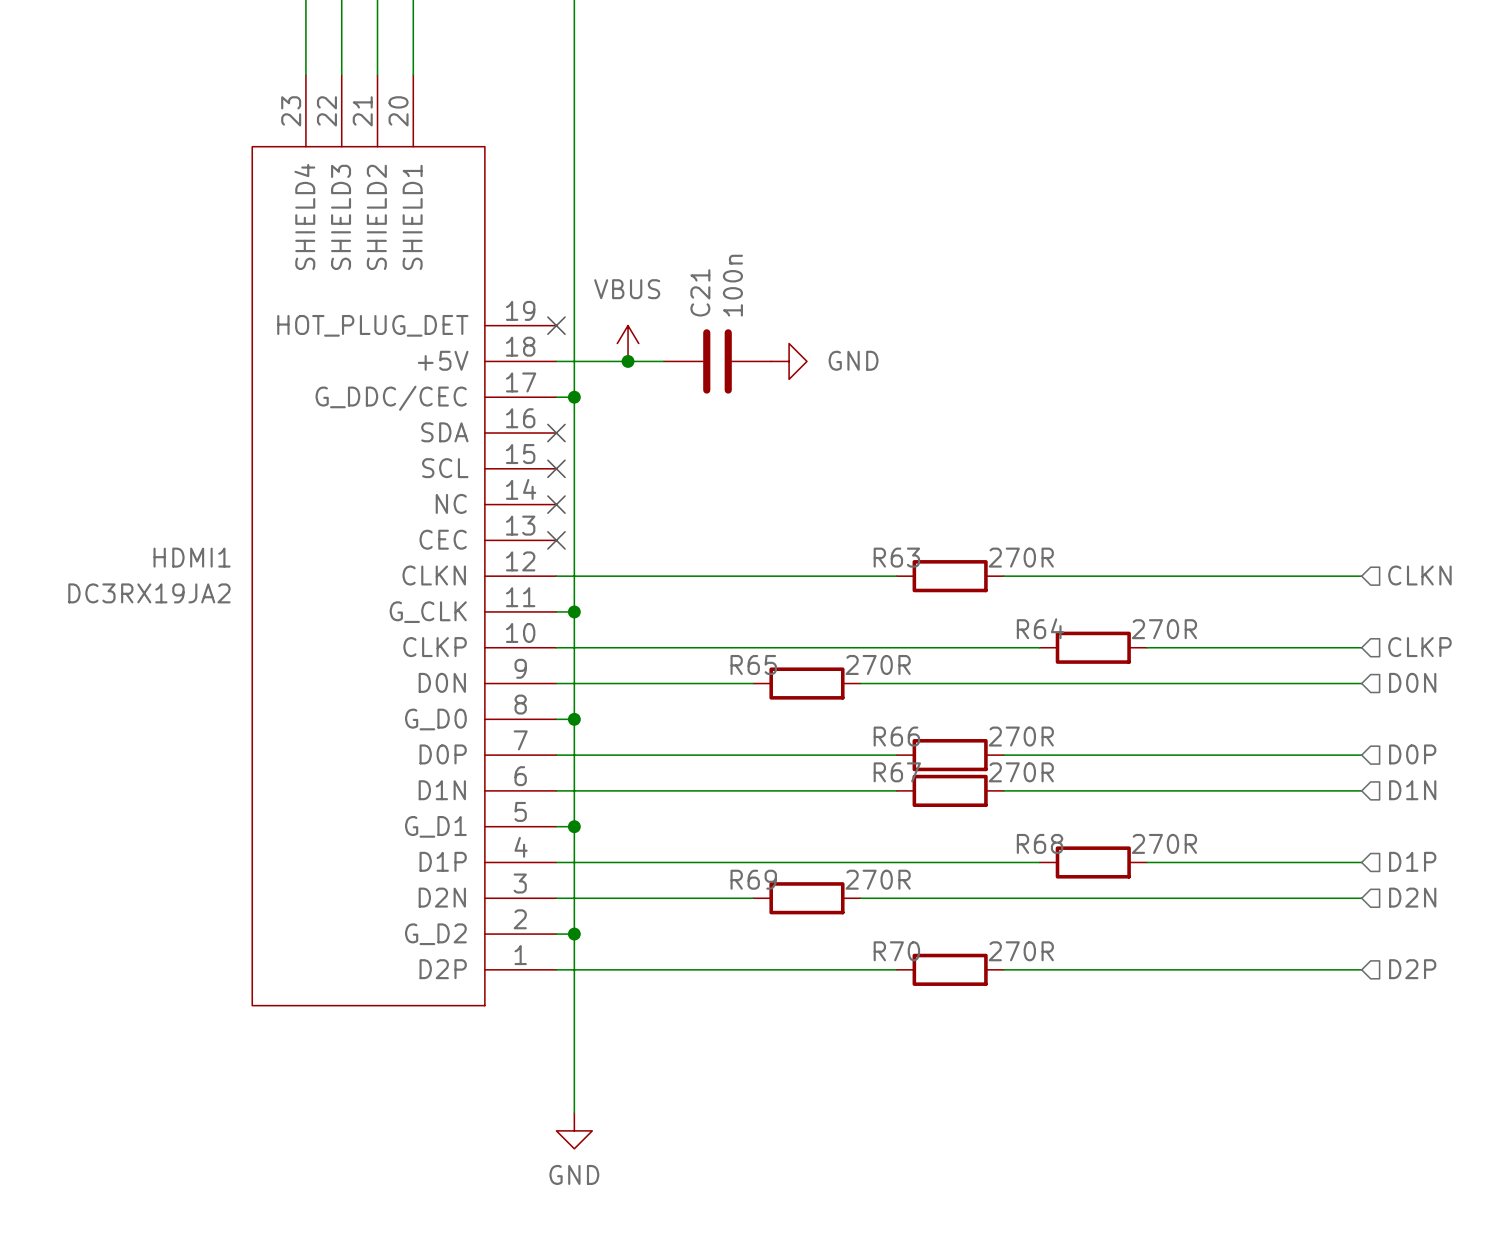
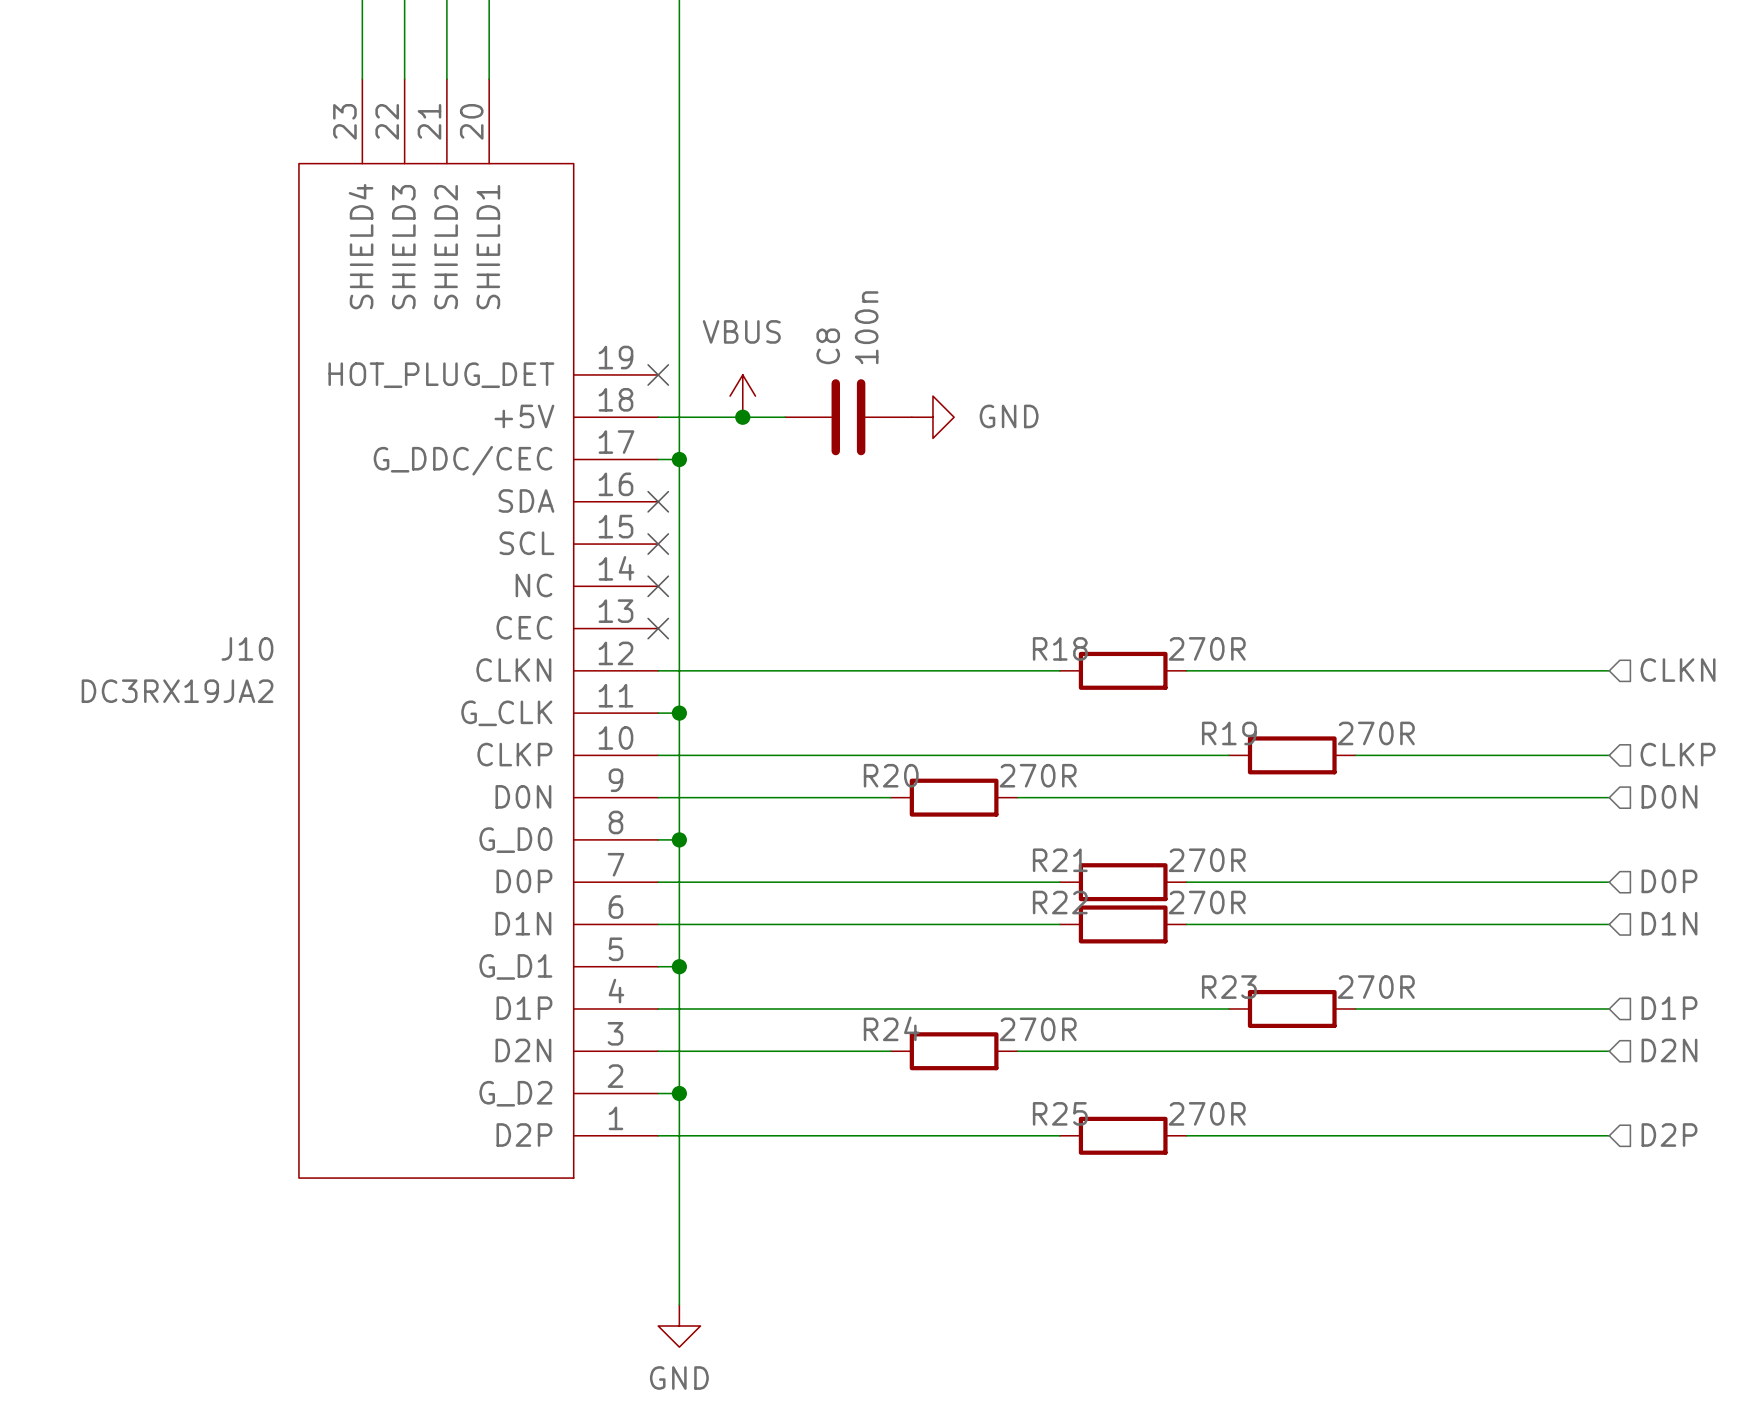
C21 name: C21 (700, 292) -> C8 (828, 346)
HDMI1 name: HDMI1 (192, 557) -> J10 (247, 648)
R63 name: R63 (896, 557) -> R18 (1060, 648)
R64 name: R64 (1040, 628) -> R19 (1229, 733)
R65 name: R65 (753, 664) -> R20 (891, 775)
R66 name: R66 (896, 736) -> R21 (1060, 860)
R67 name: R67 (897, 772) -> R22 (1060, 902)
R68 name: R68 (1040, 843) -> R23 (1229, 987)
R69 name: R69 (753, 879) -> R24 (891, 1028)
R70 name: R70 (896, 951) -> R25 (1060, 1113)

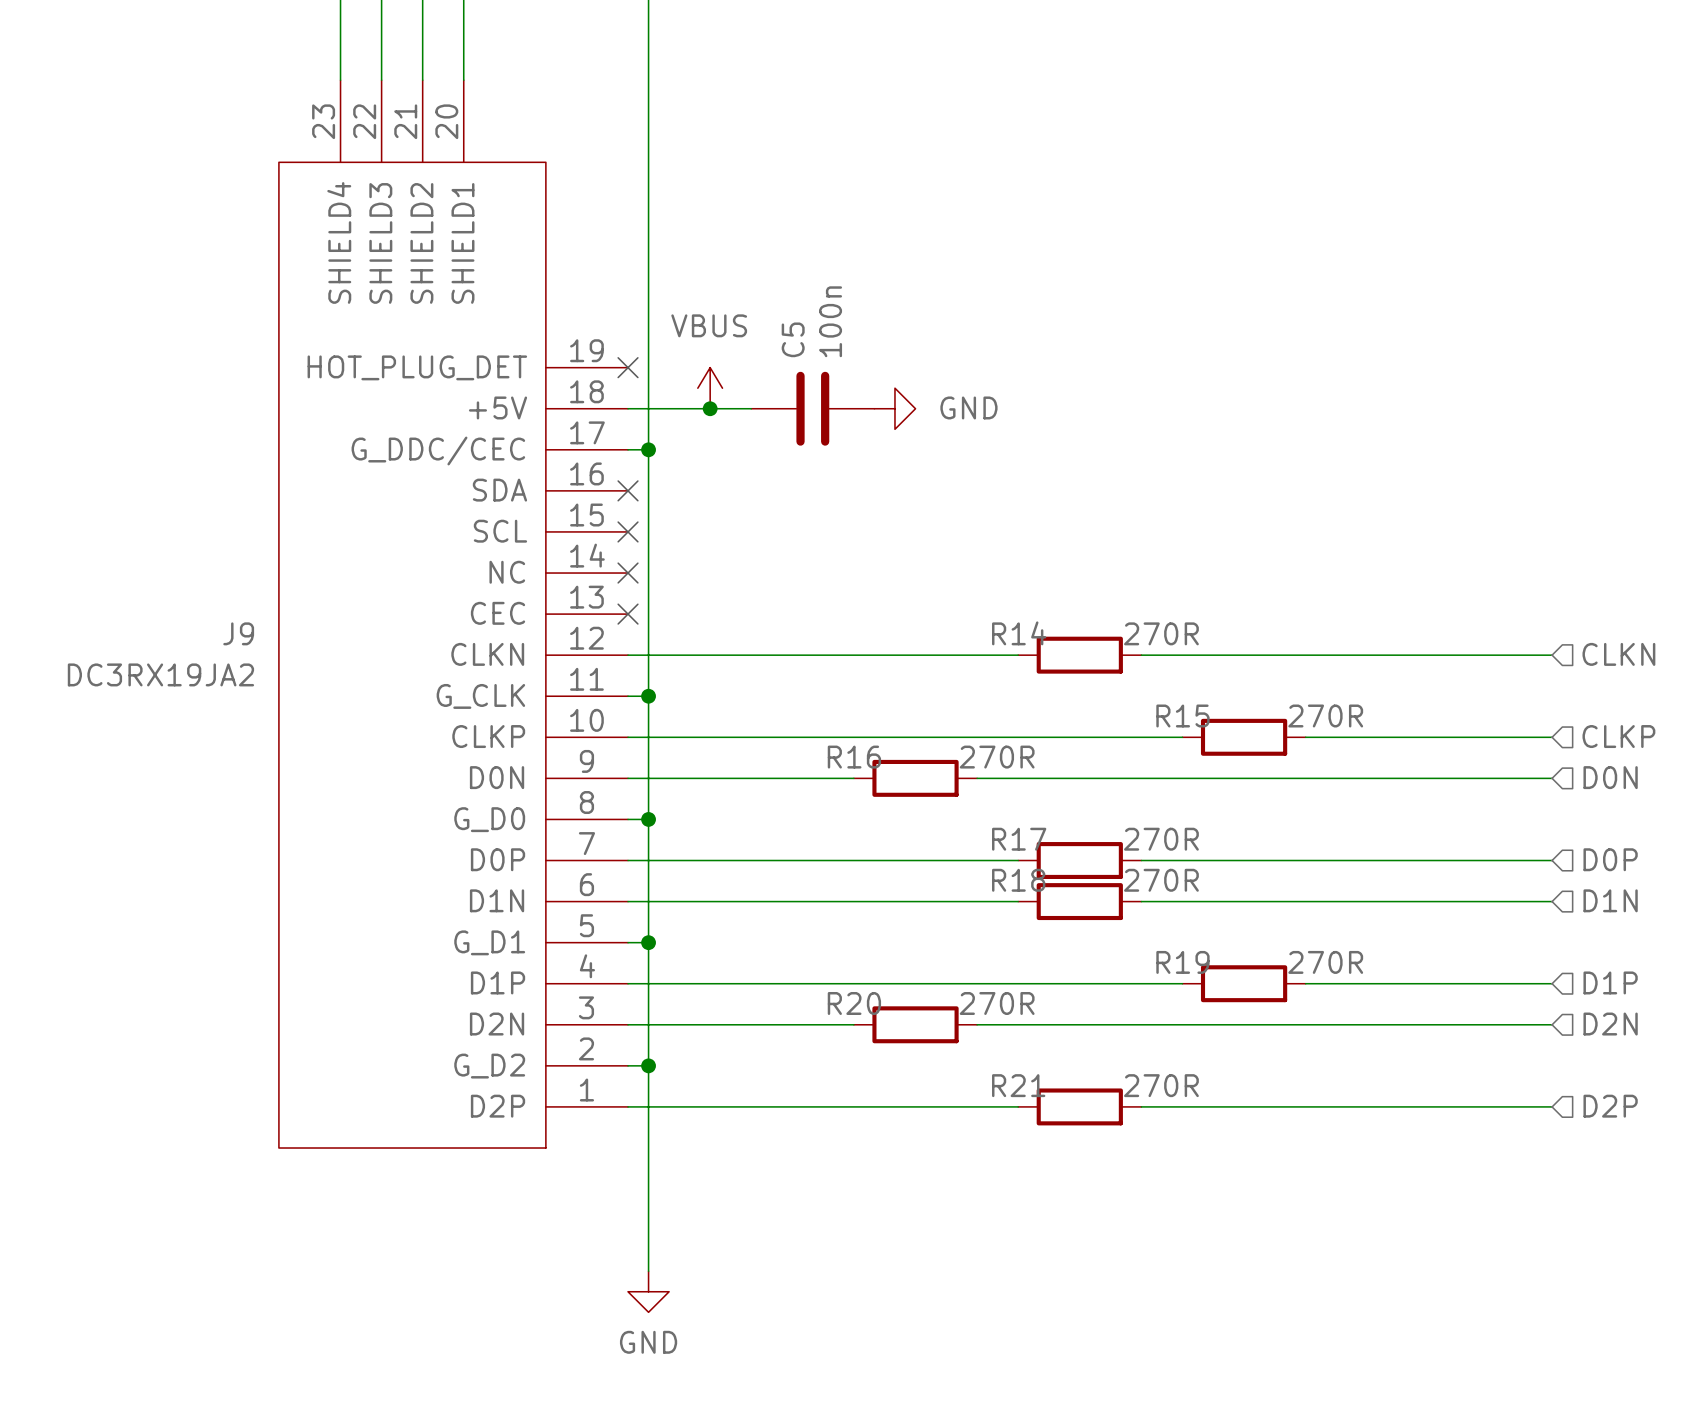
C8 name: C8 (828, 346) -> C5 (793, 339)
J10 name: J10 (247, 648) -> J9 (238, 633)
R18 name: R18 (1060, 648) -> R14 (1019, 633)
R19 name: R19 (1229, 733) -> R15 (1182, 716)
R20 name: R20 (891, 775) -> R16 (854, 757)
R21 name: R21 (1060, 860) -> R17 (1019, 839)
R22 name: R22 (1060, 902) -> R18 (1018, 880)
R23 name: R23 (1229, 987) -> R19 (1182, 962)
R24 name: R24 (891, 1028) -> R20 (854, 1003)
R25 name: R25 (1060, 1113) -> R21 (1018, 1085)

